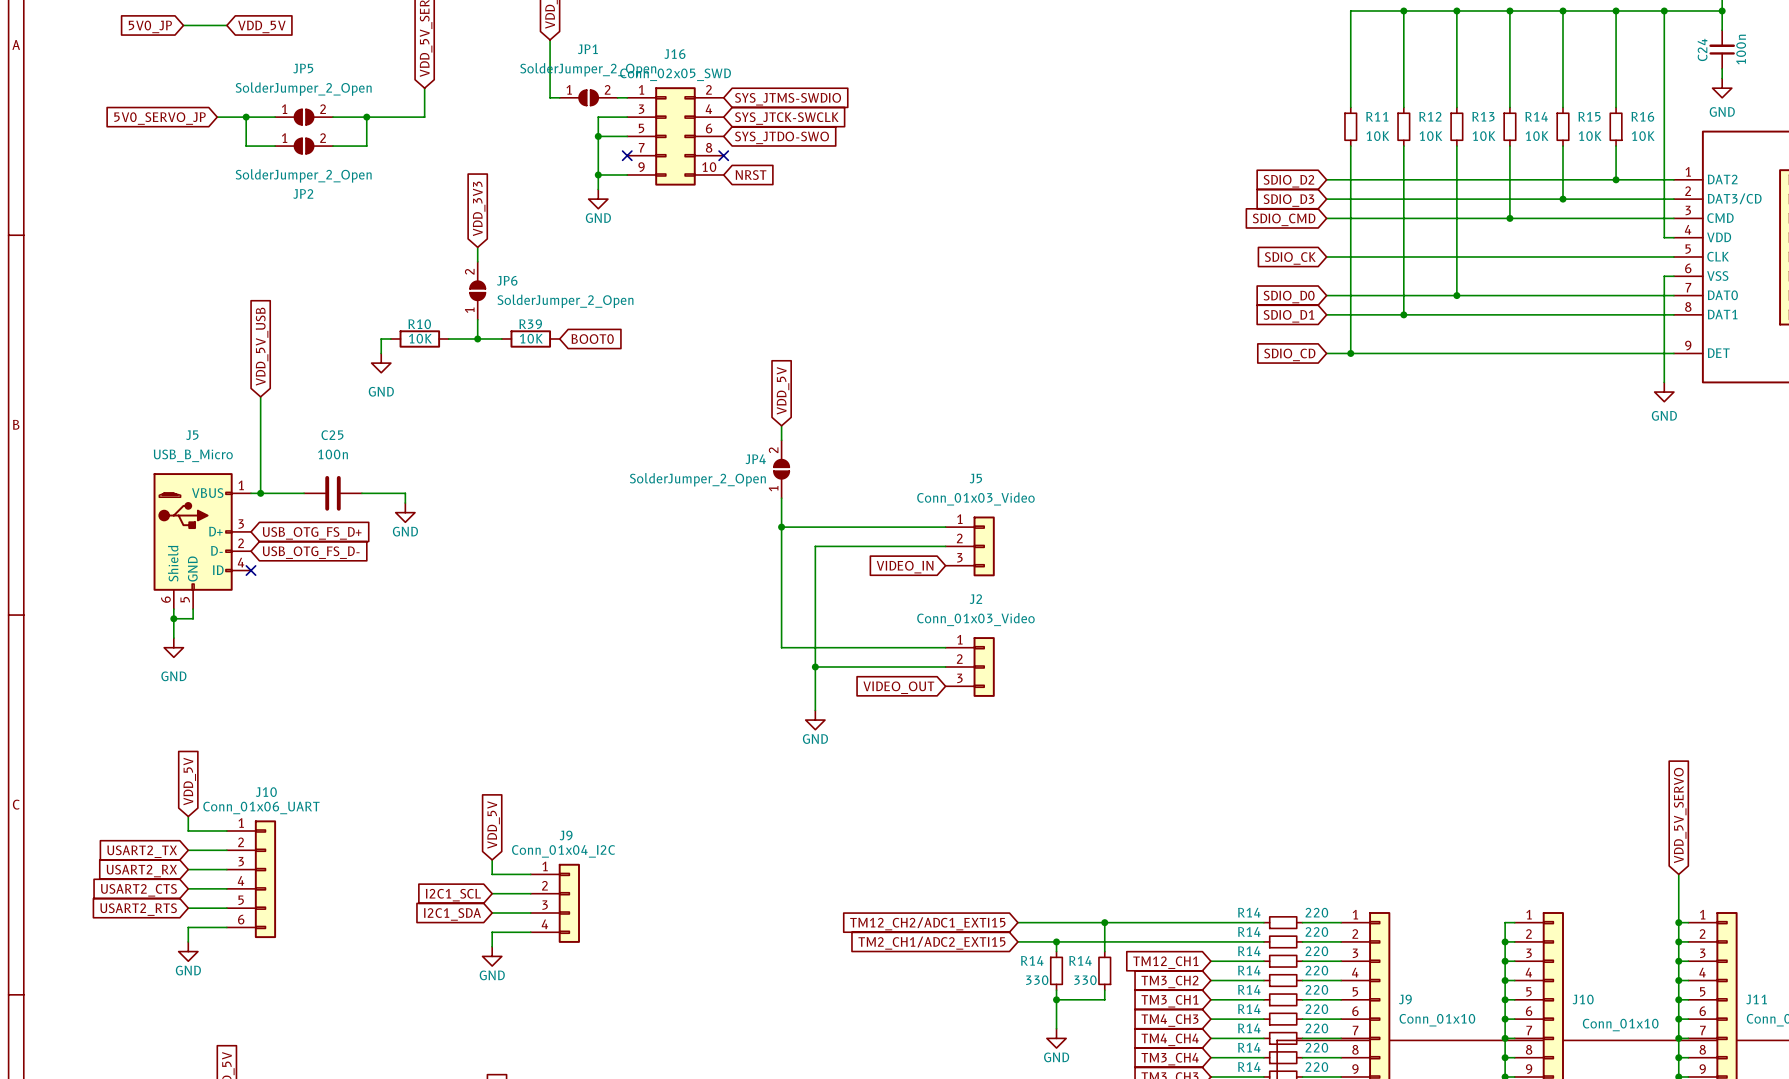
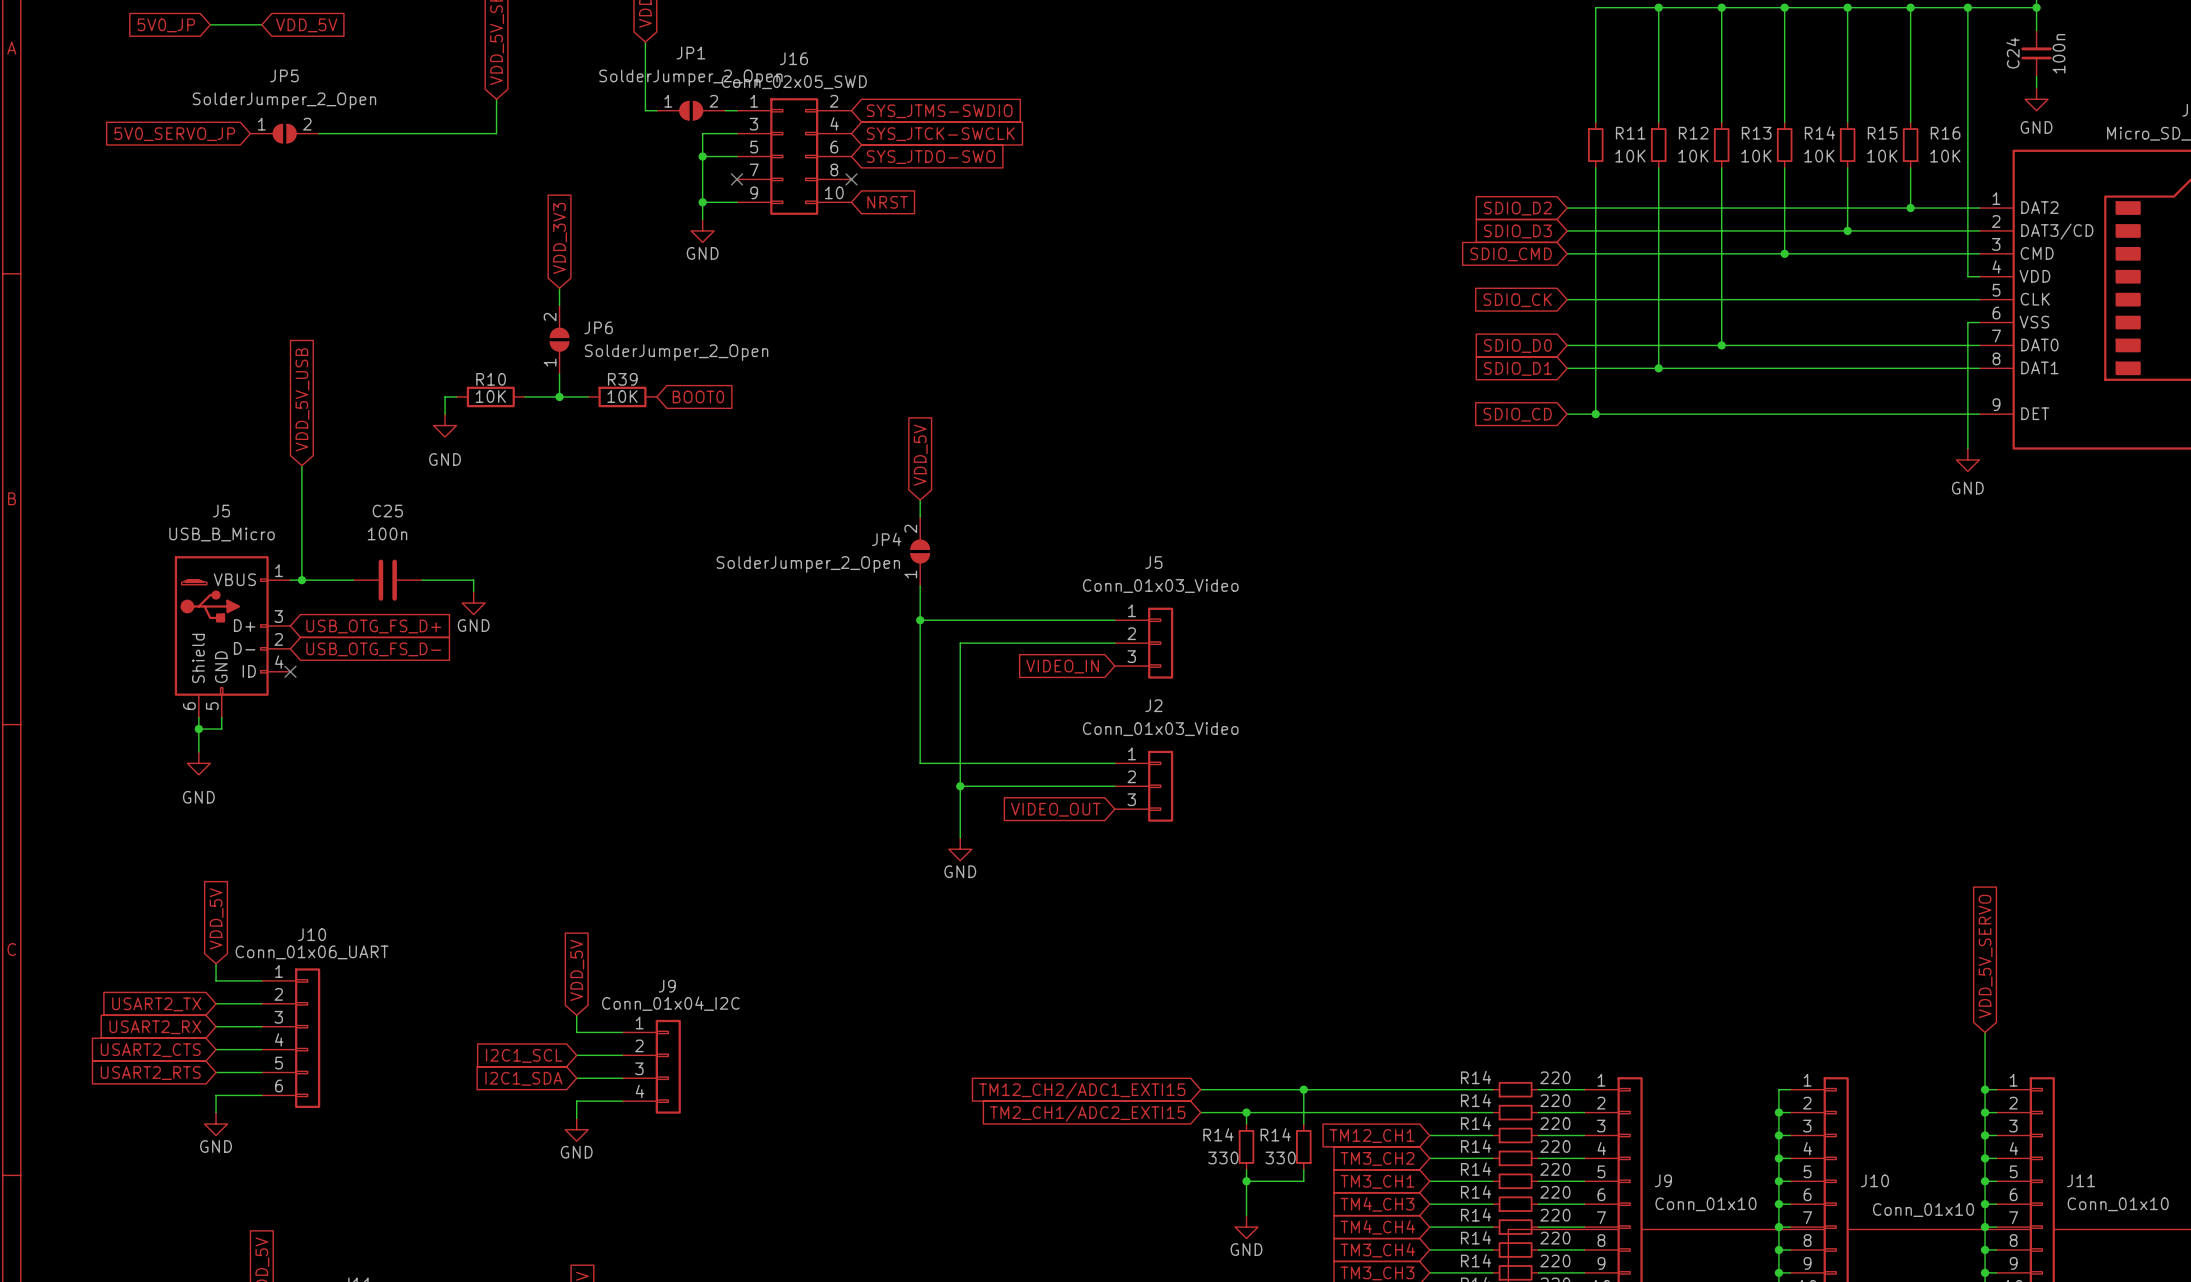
wire: (246, 117) (246, 146) (275, 146) -> none
junction: (246, 117) -> none
JP5 position: (304, 117) -> (284, 133)
wire: (366, 117) (366, 146) (332, 146) -> none
junction: (366, 117) -> none
JP2: SolderJumper_2_Open (304, 146) -> none

